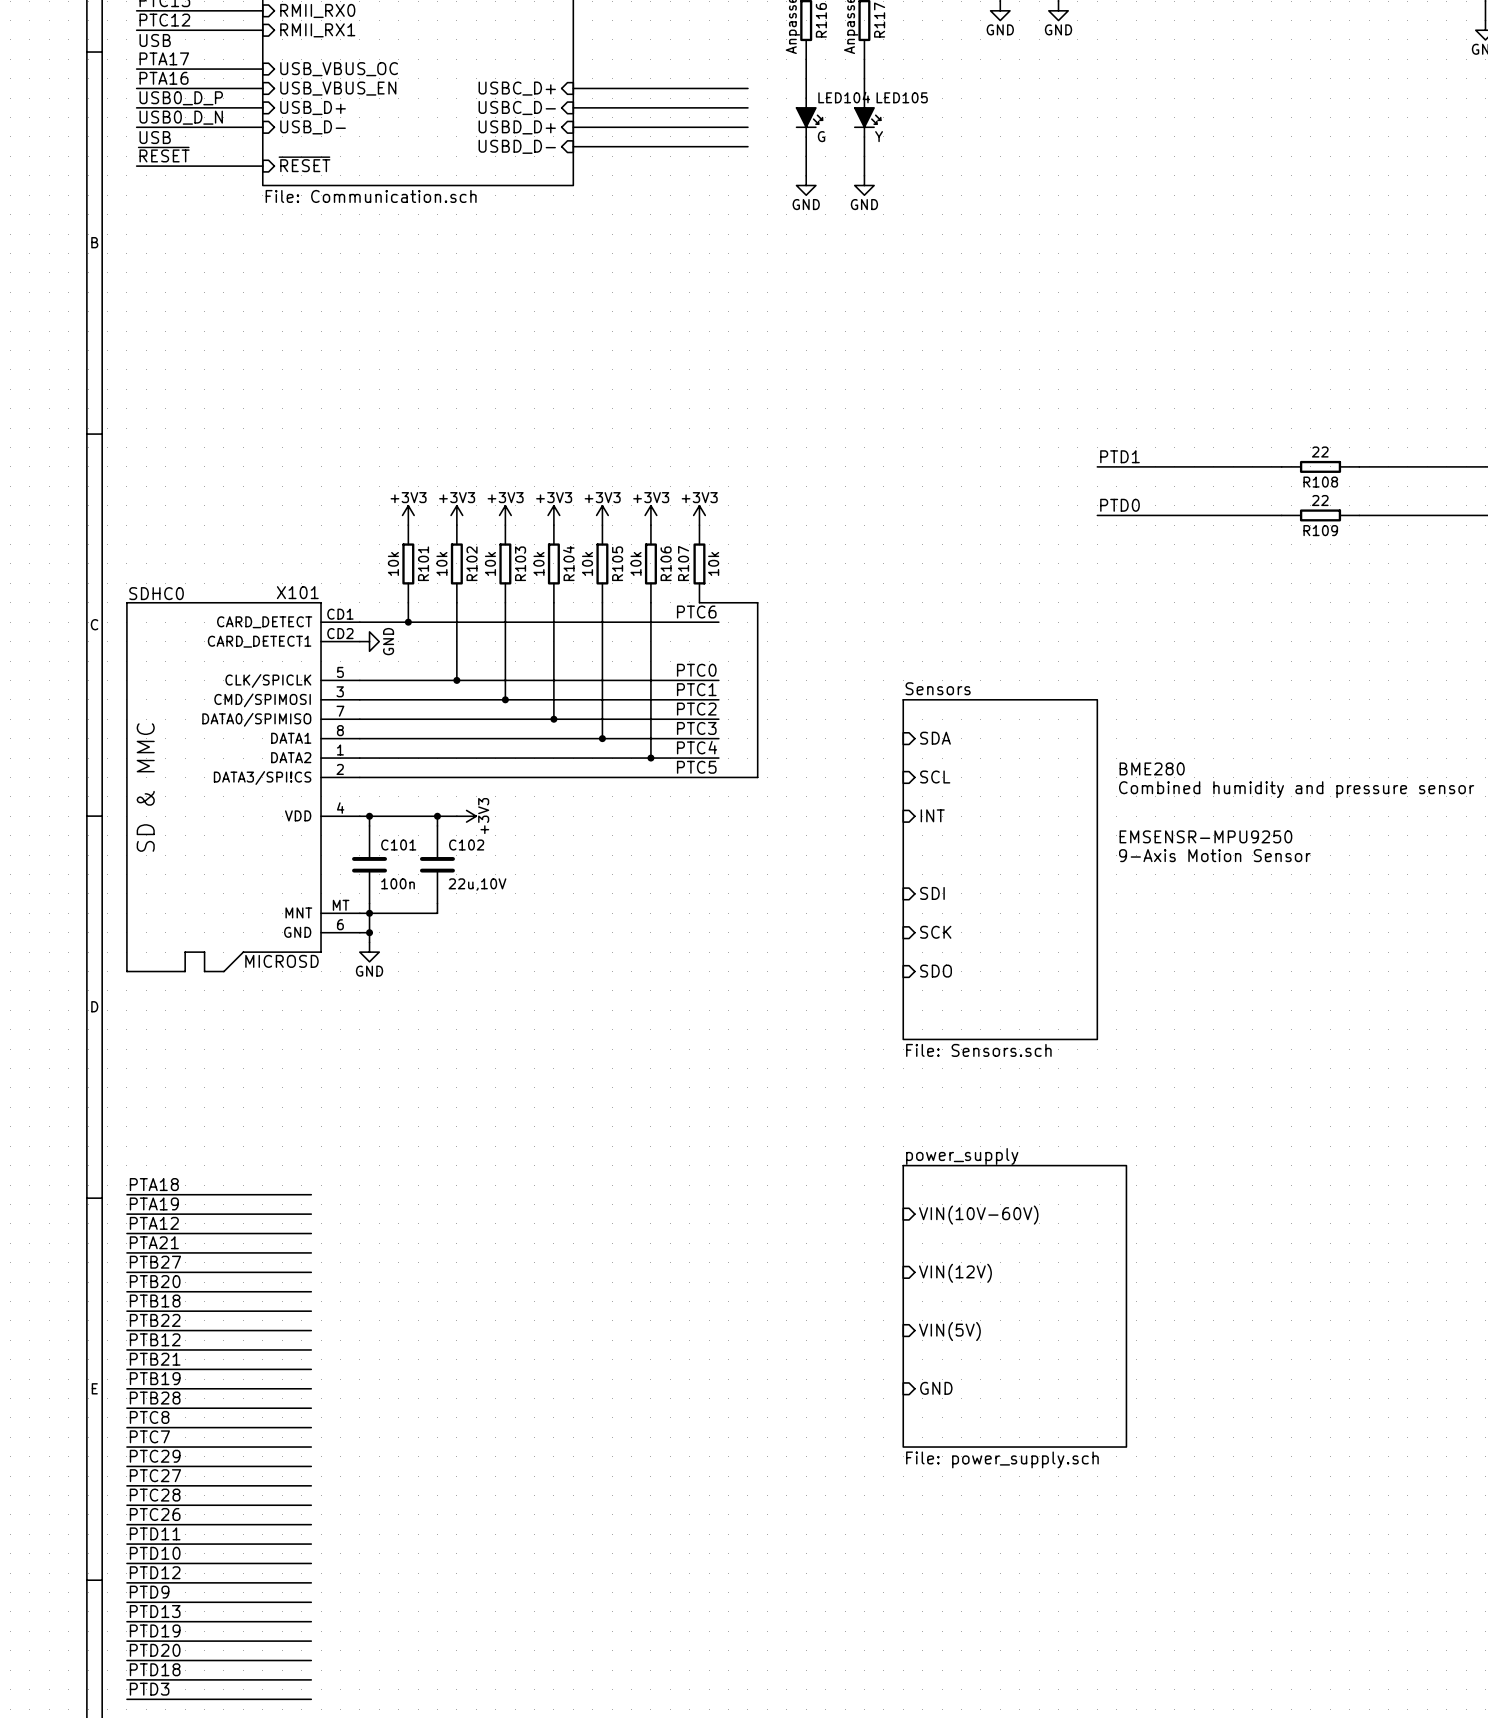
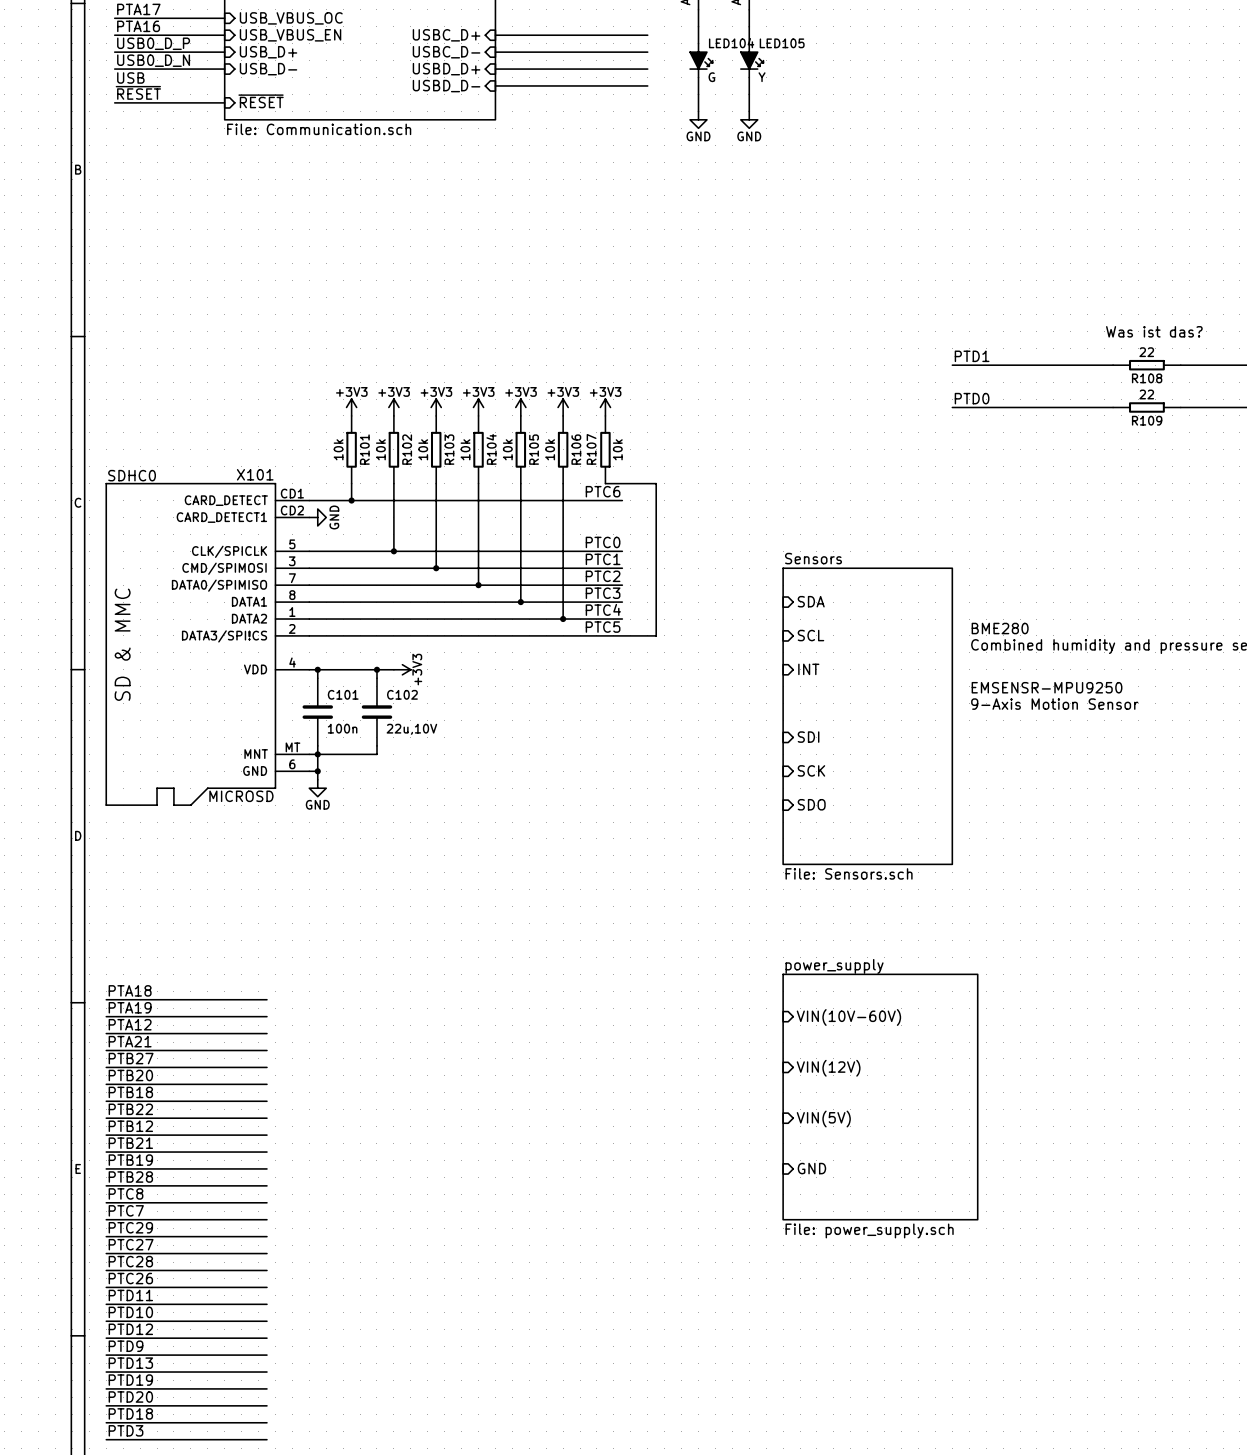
text: none -> Was ist das? (1154, 331)

